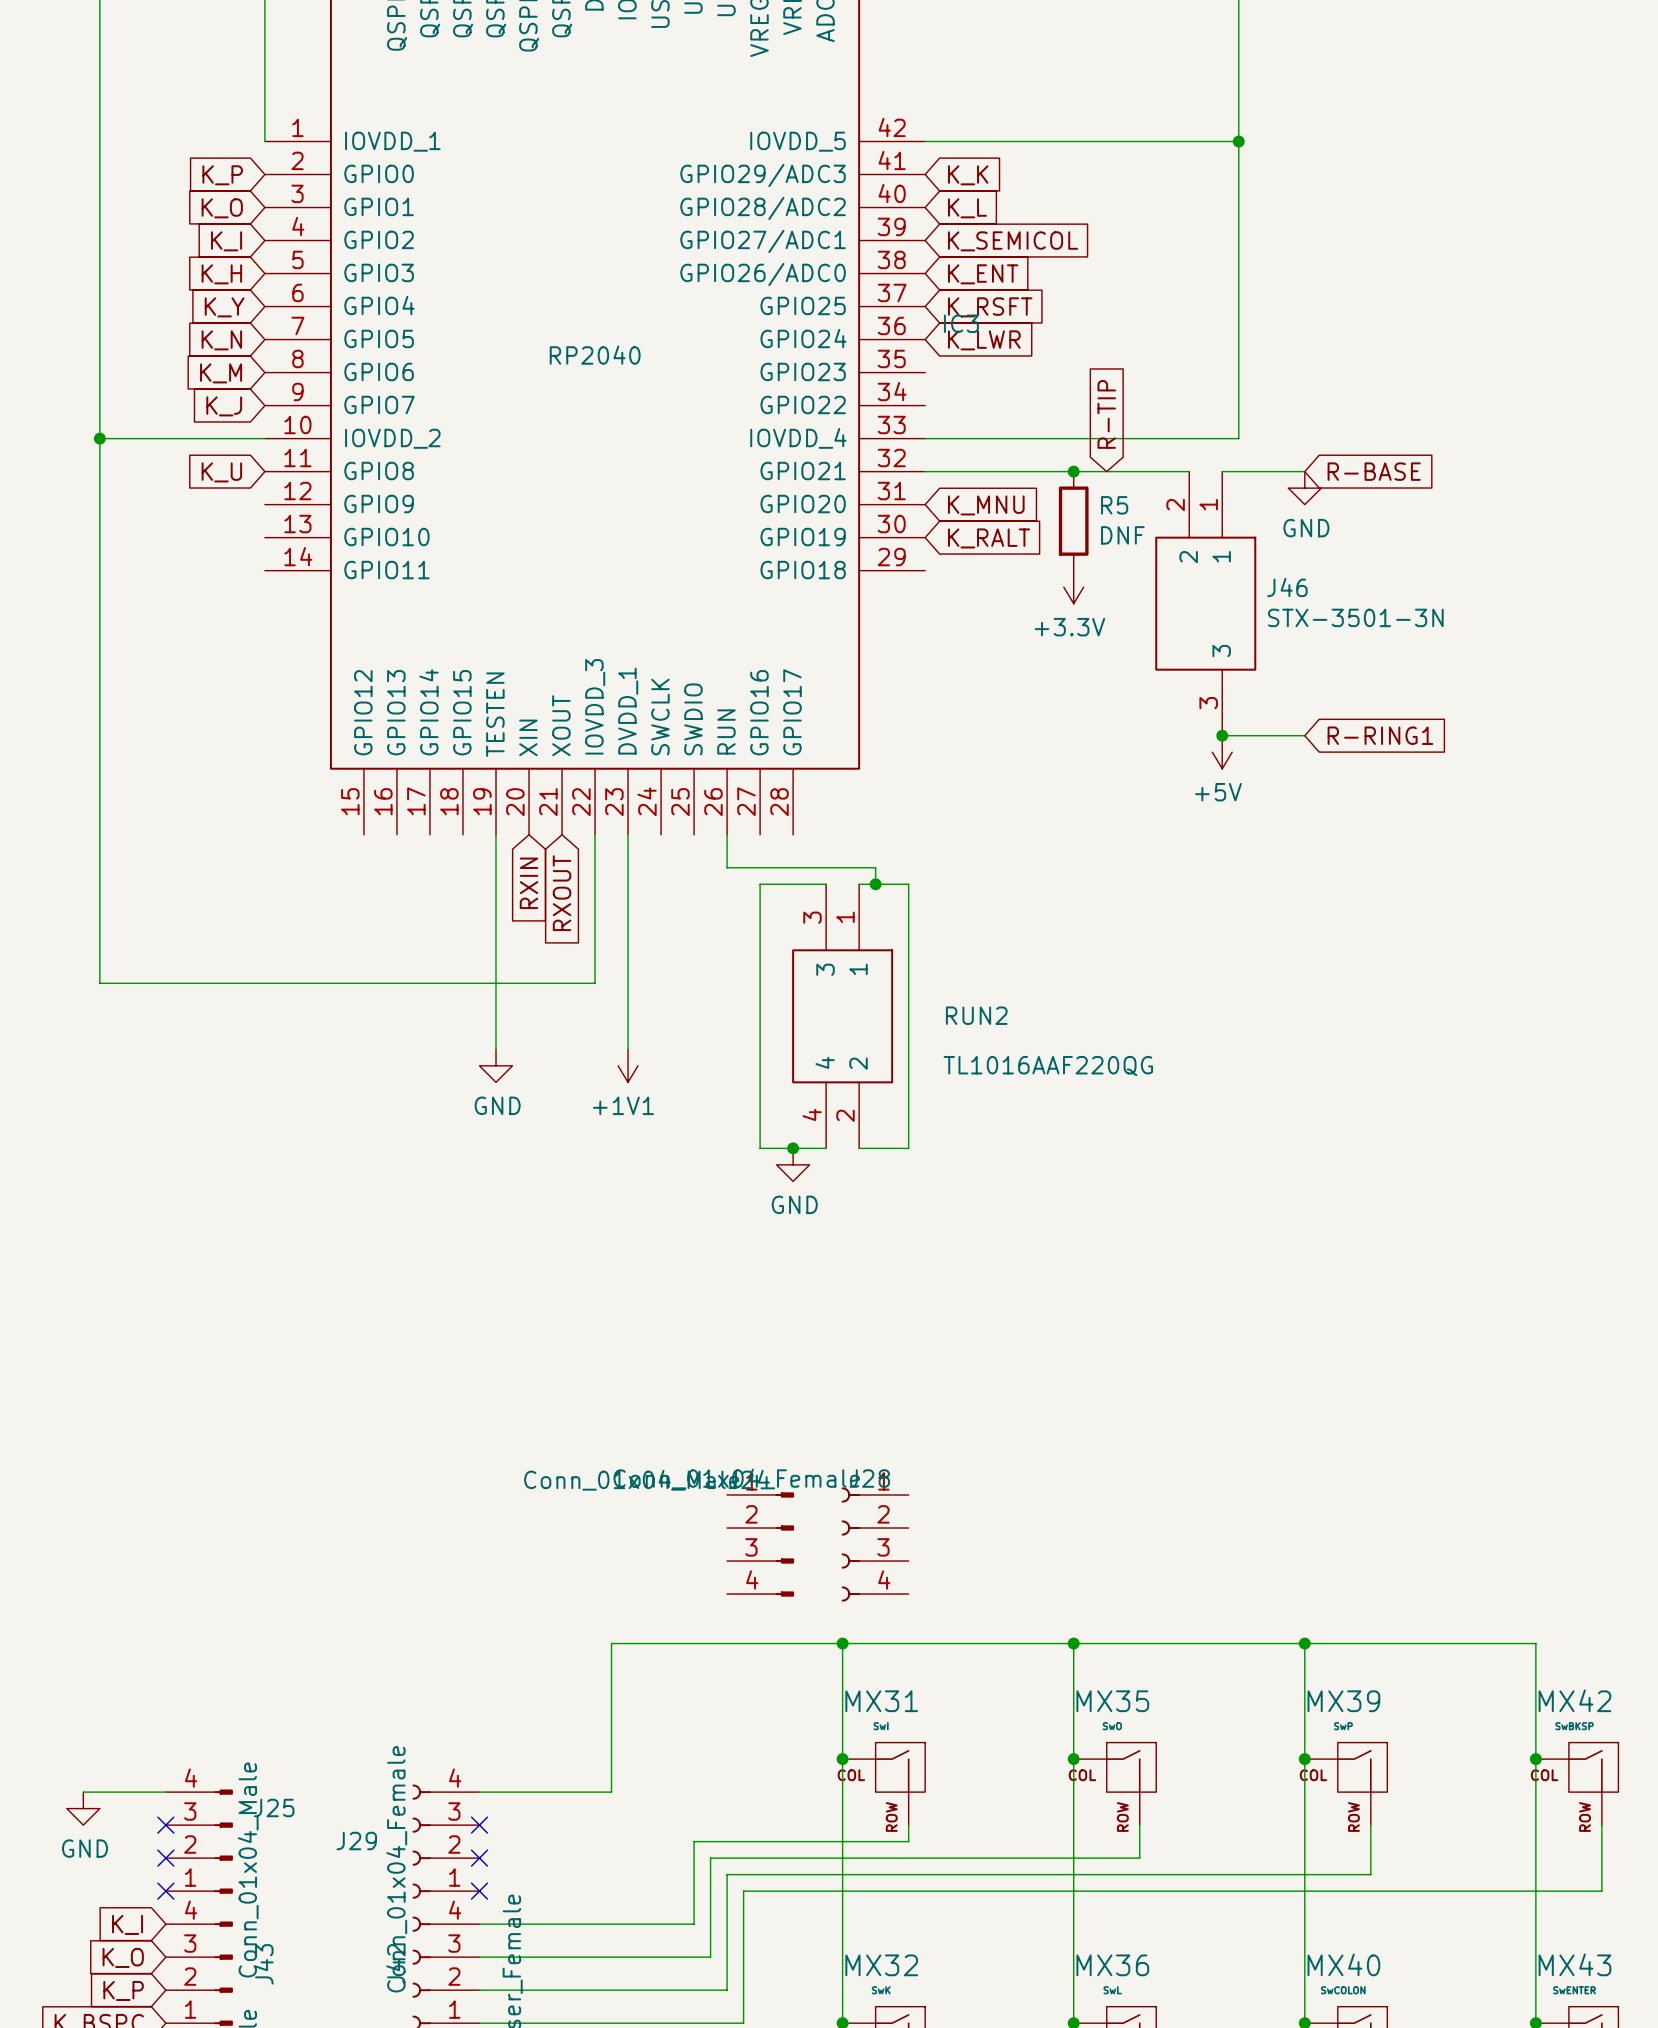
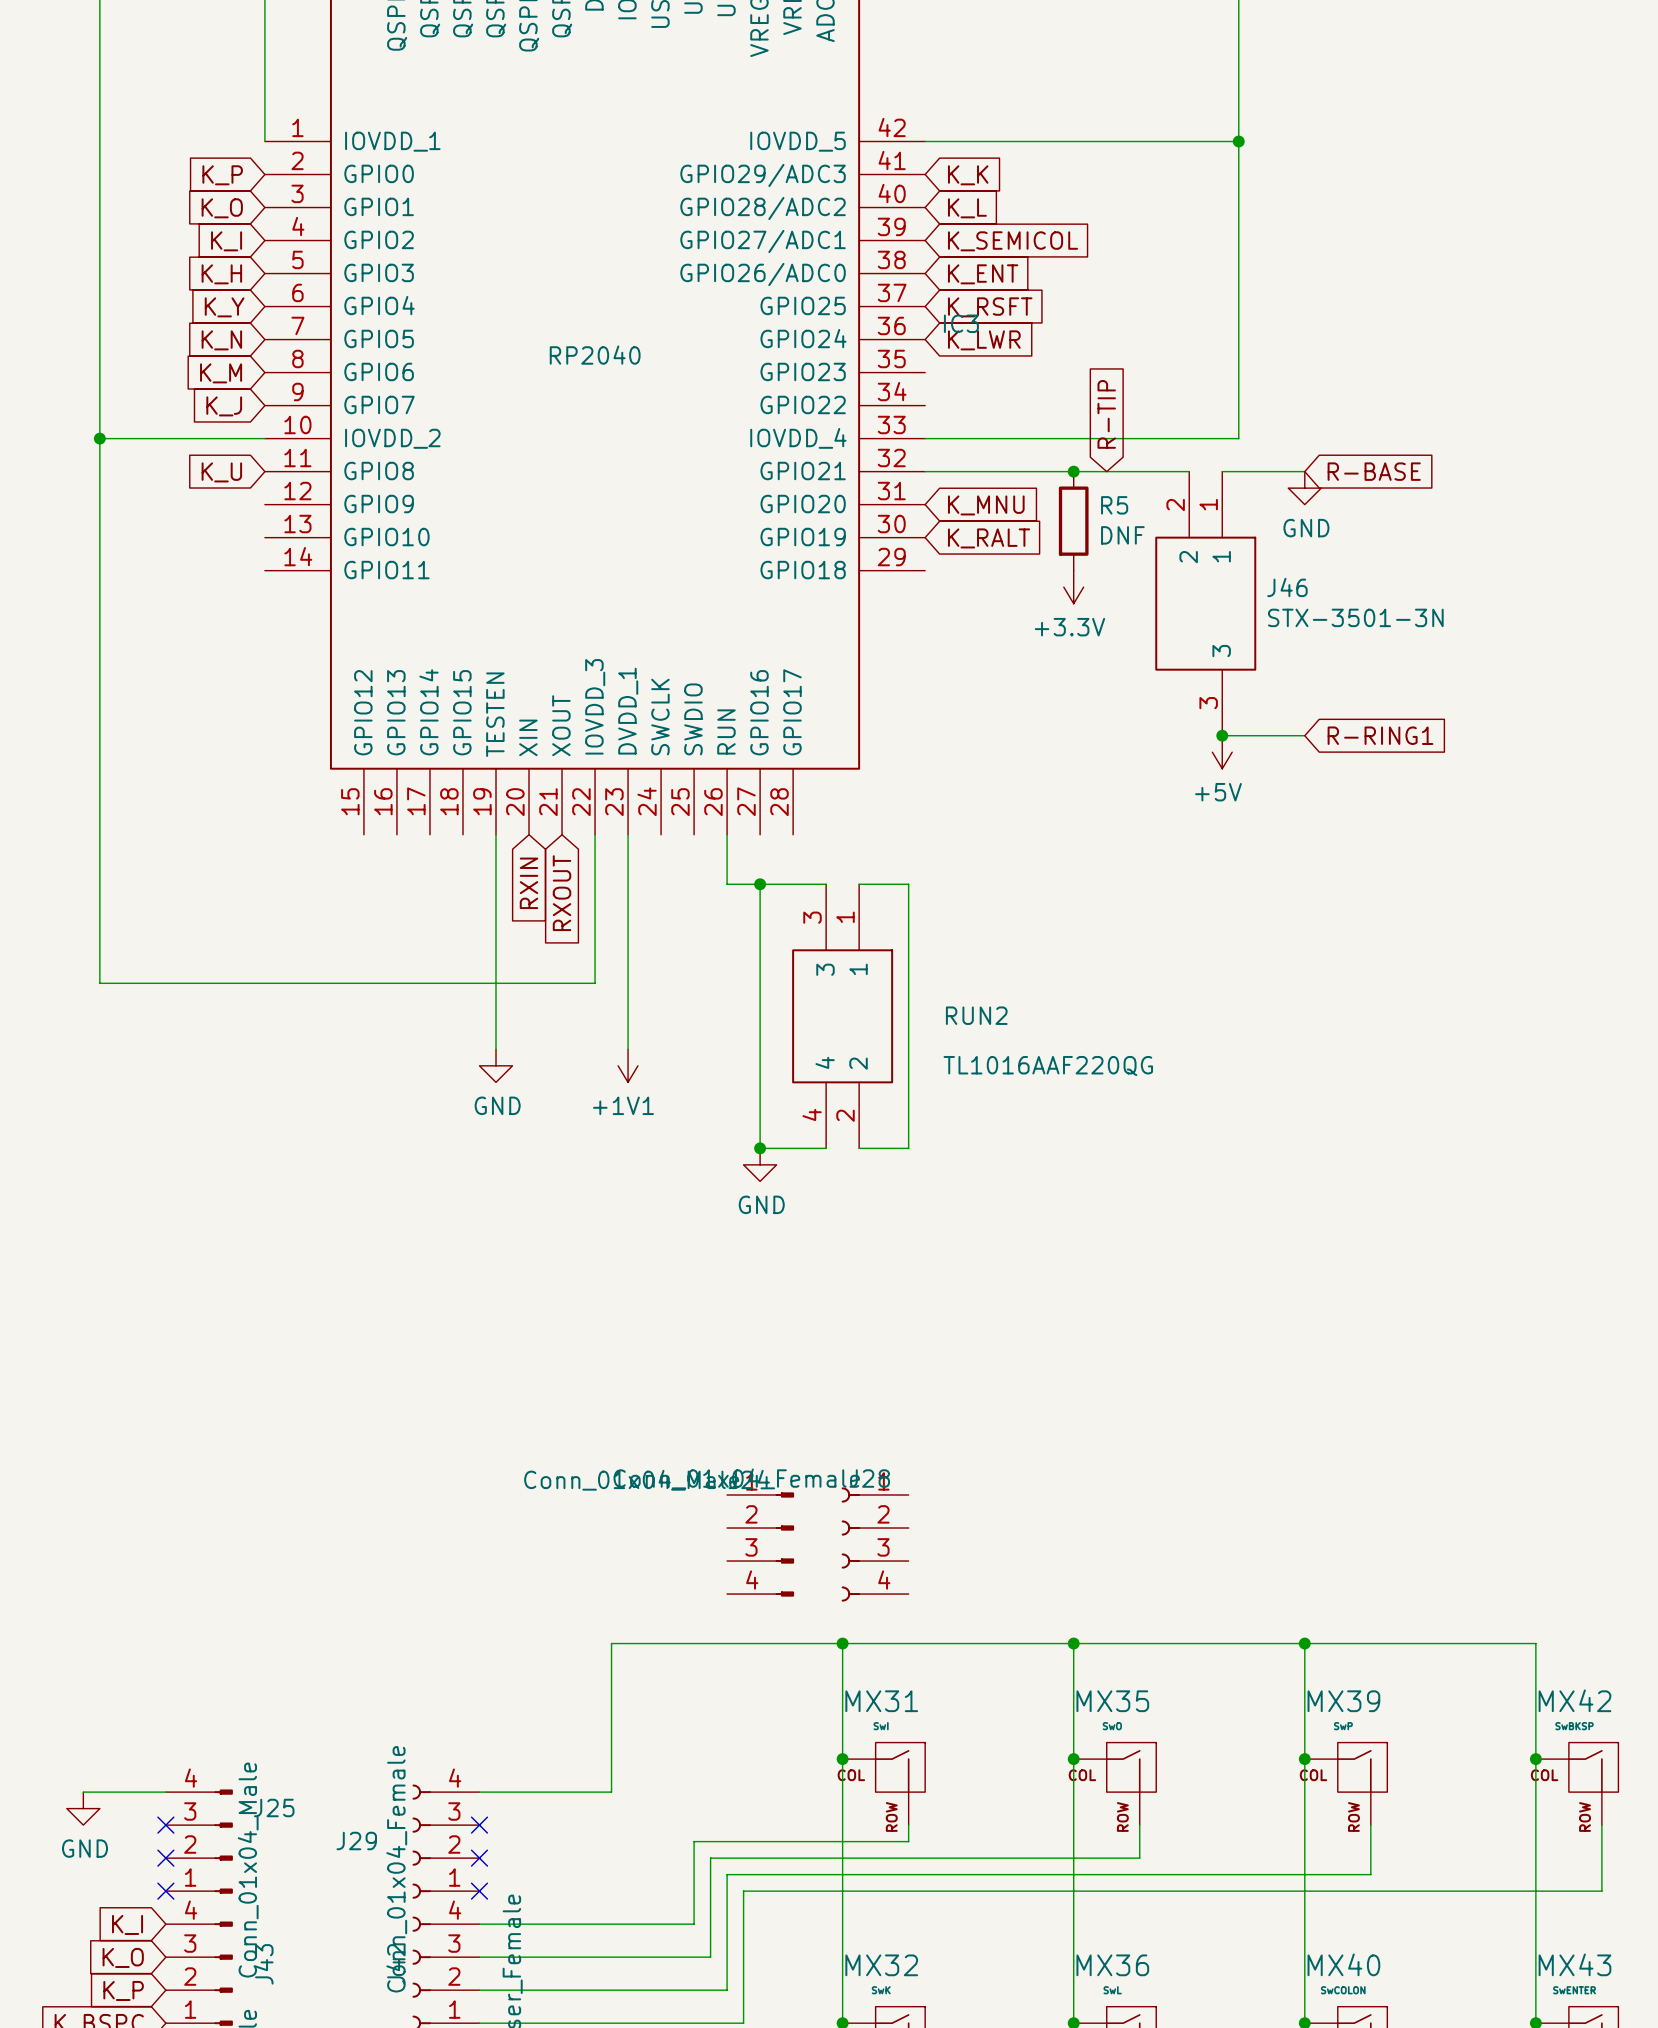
wire: (727, 867) (875, 867) (875, 884) -> (727, 867) (727, 884) (760, 884)
junction: none -> (760, 884)
junction: (875, 884) -> none
junction position: (793, 1148) -> (760, 1148)
power symbol position: GND (793, 1164) -> GND (760, 1164)

